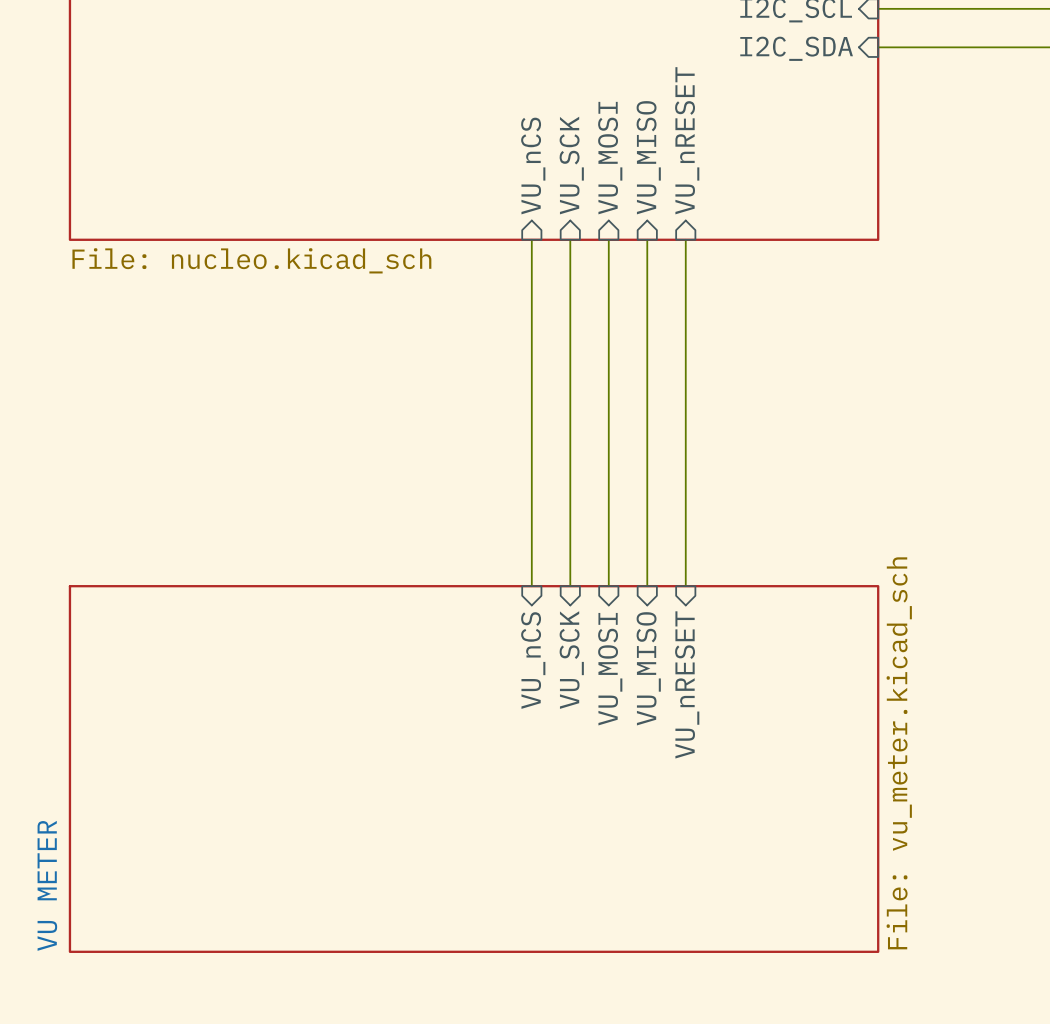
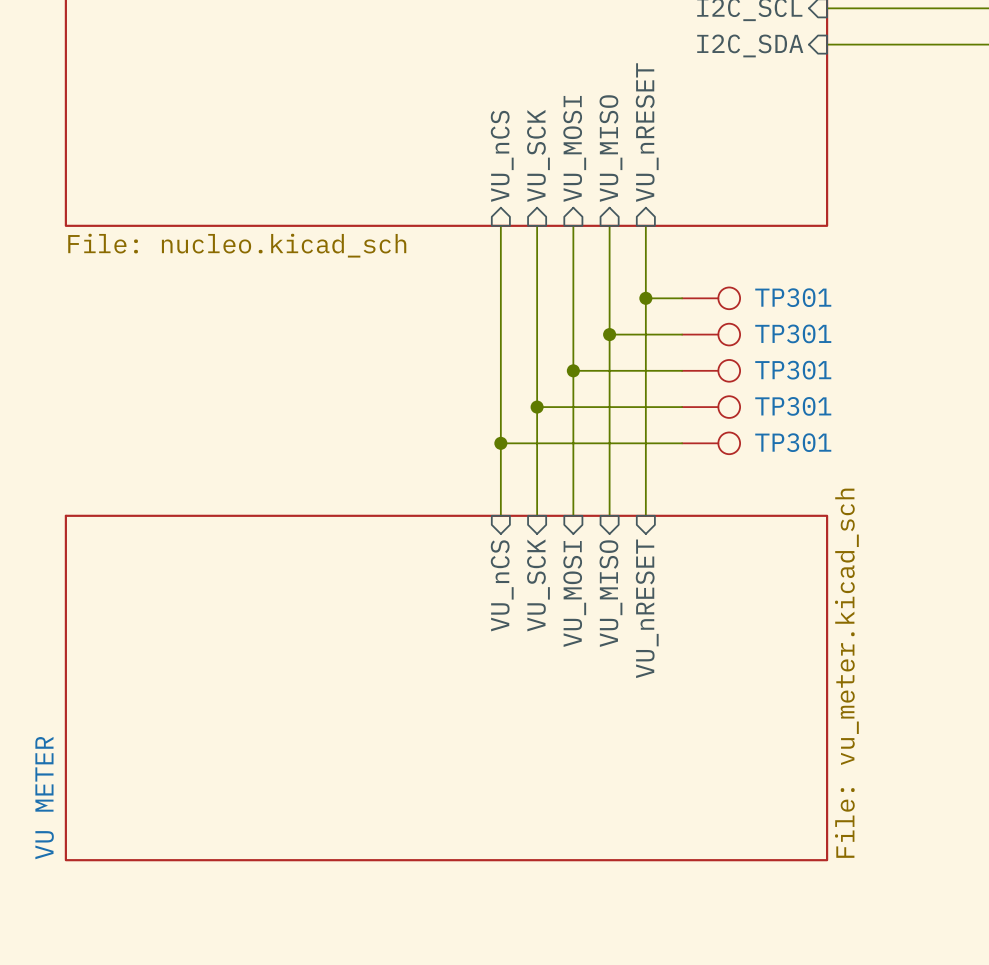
wire: none -> (645, 298) (682, 298)
junction: none -> (645, 298)
TP301: none -> (711, 298)
wire: none -> (609, 334) (682, 334)
junction: none -> (609, 334)
TP301: none -> (711, 334)
wire: none -> (573, 370) (682, 370)
junction: none -> (573, 370)
TP301: none -> (711, 370)
wire: none -> (537, 407) (682, 407)
junction: none -> (537, 407)
TP301: none -> (711, 407)
wire: none -> (500, 443) (682, 443)
junction: none -> (500, 443)
TP301: none -> (711, 443)
wire: (531, 547) (531, 586) -> none
wire: (570, 547) (570, 586) -> none
wire: (608, 547) (608, 586) -> none
wire: (647, 547) (647, 586) -> none
wire: (685, 547) (685, 586) -> none
sheet pin position: VU_nCS (533, 660) -> VU_nCS (502, 585)
sheet pin position: VU_SCK (571, 660) -> VU_SCK (538, 585)
sheet pin position: VU_MISO (648, 668) -> VU_MISO (610, 593)
sheet pin position: VU_MOSI (610, 669) -> VU_MOSI (574, 593)
sheet pin position: VU_nRESET (687, 684) -> VU_nRESET (647, 608)
sheet VU METER position: (474, 769) -> (446, 688)

